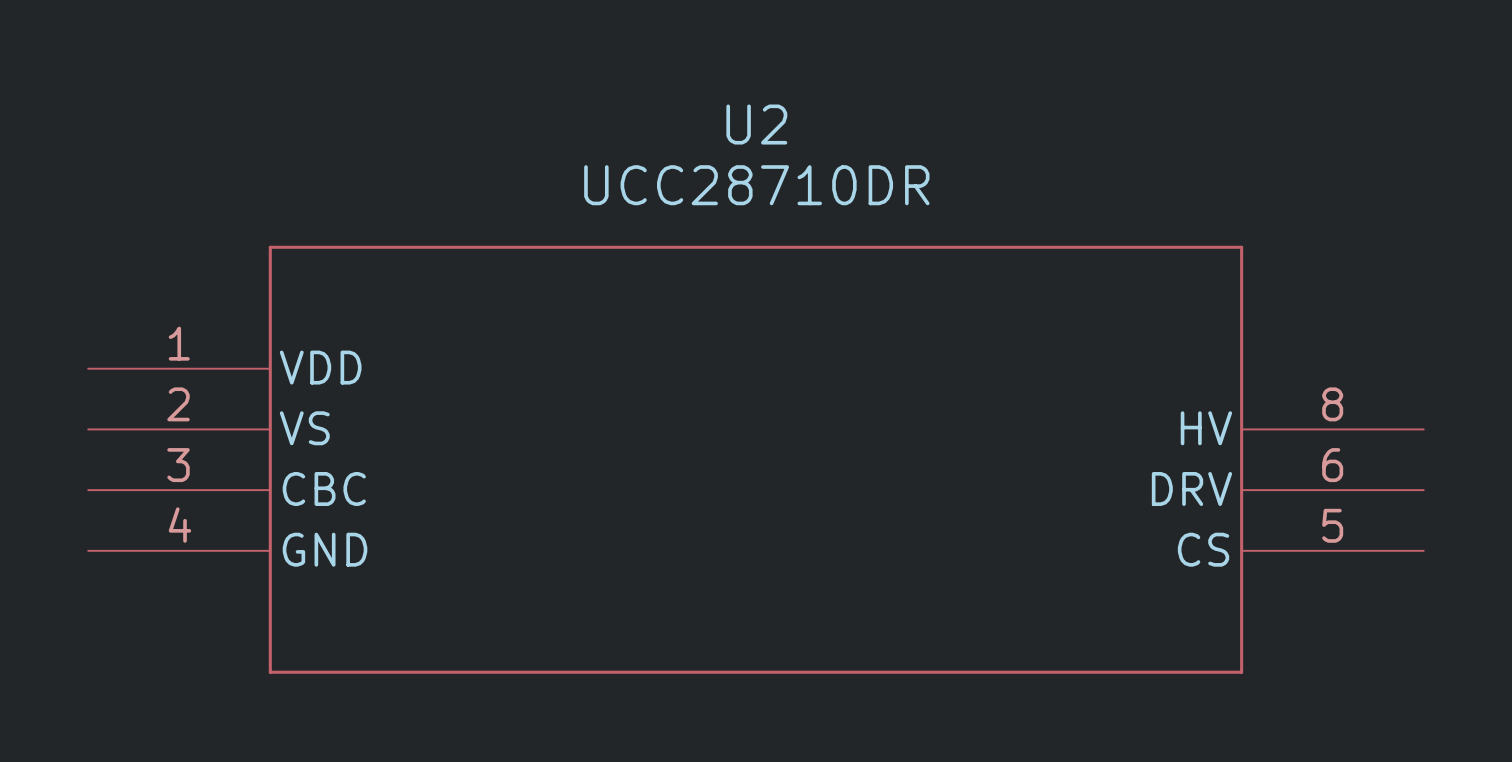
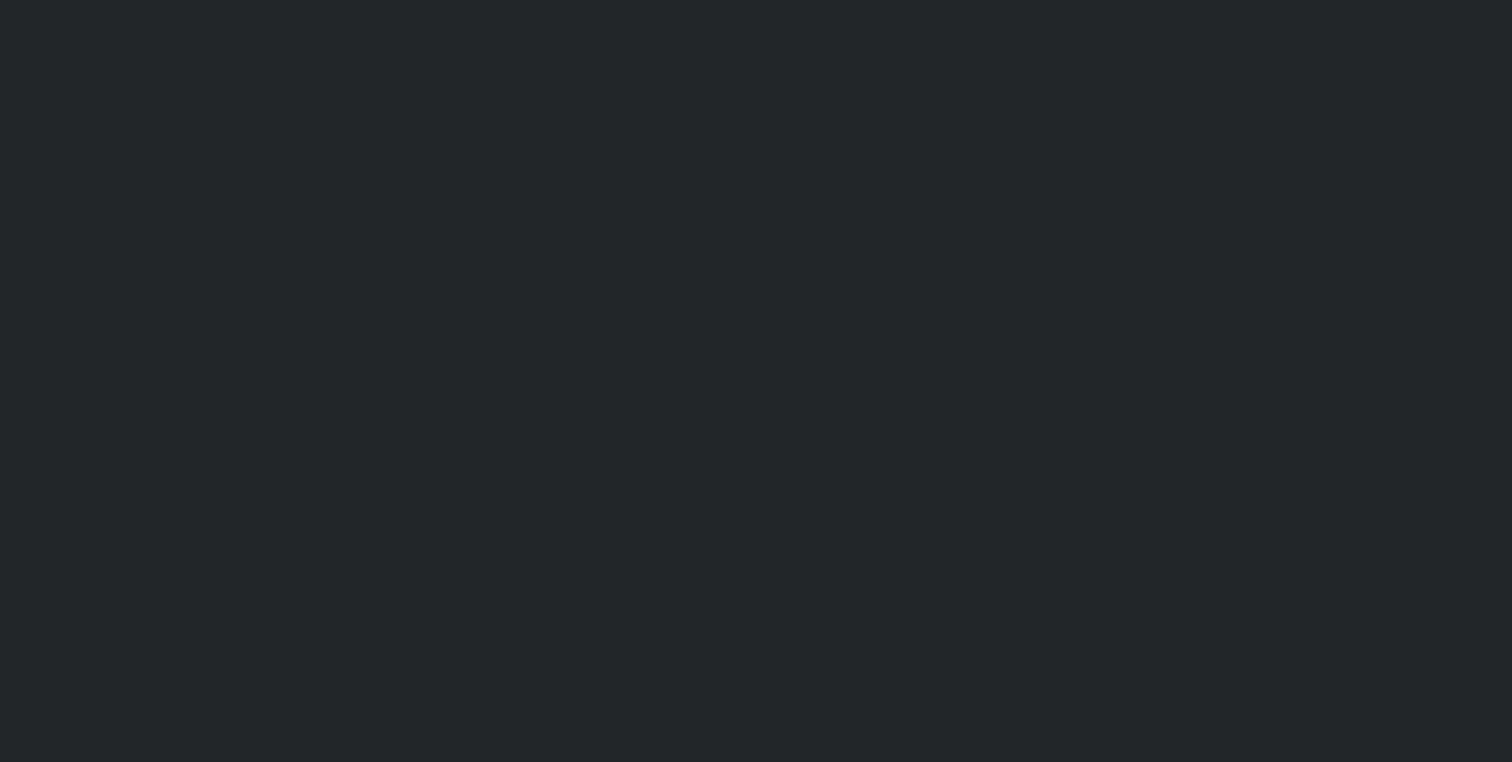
U2: UCC28710DR (755, 459) -> none

